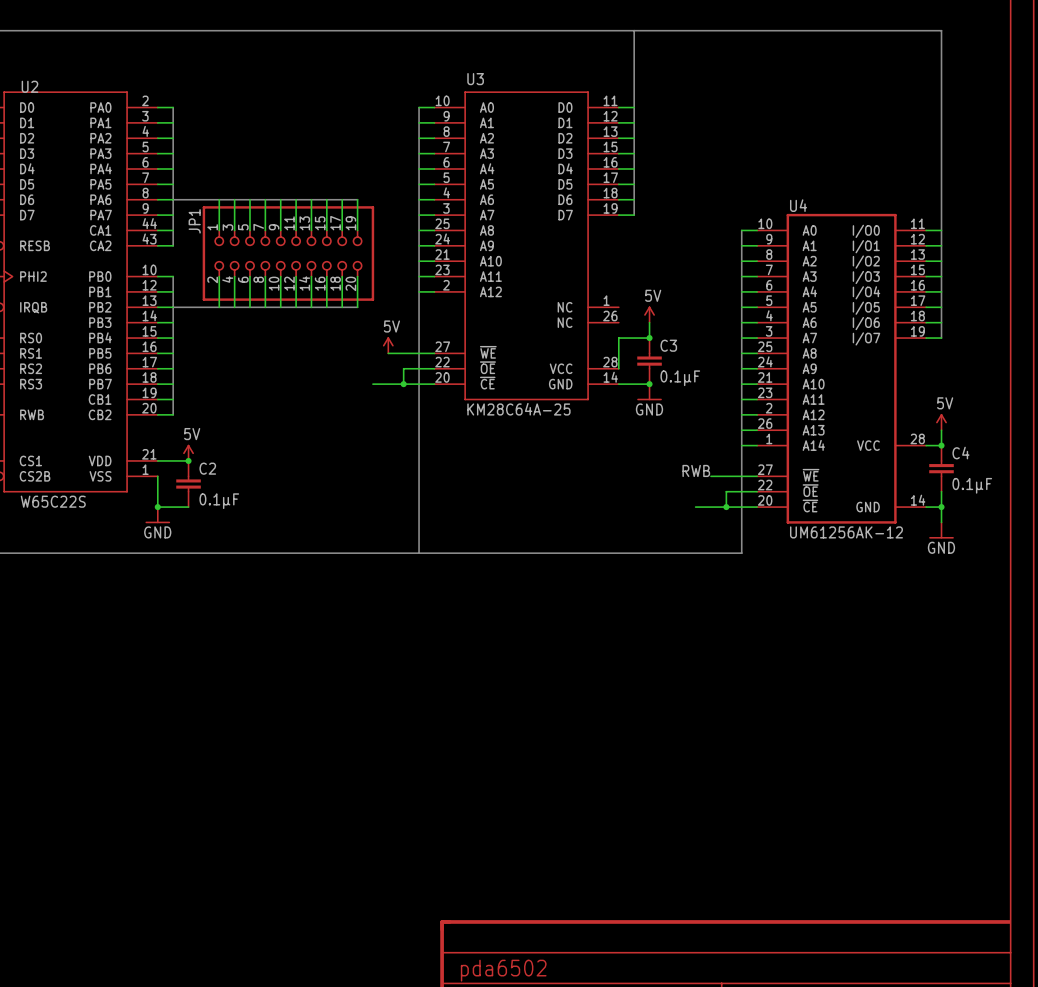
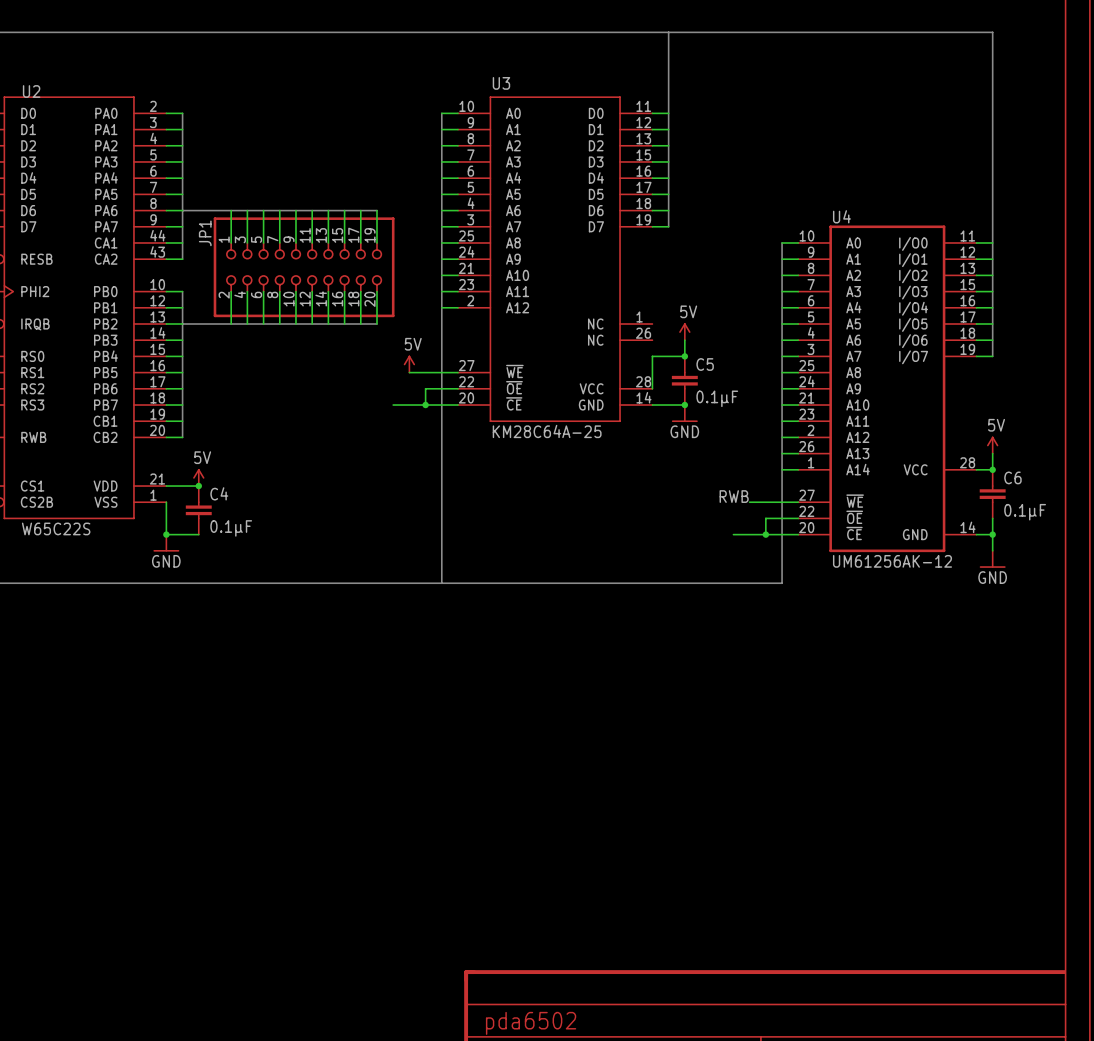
C3 name: C3 (668, 345) -> C5 (705, 364)
C4 name: C4 (960, 453) -> C6 (1012, 477)
C2 name: C2 (207, 468) -> C4 (219, 493)

